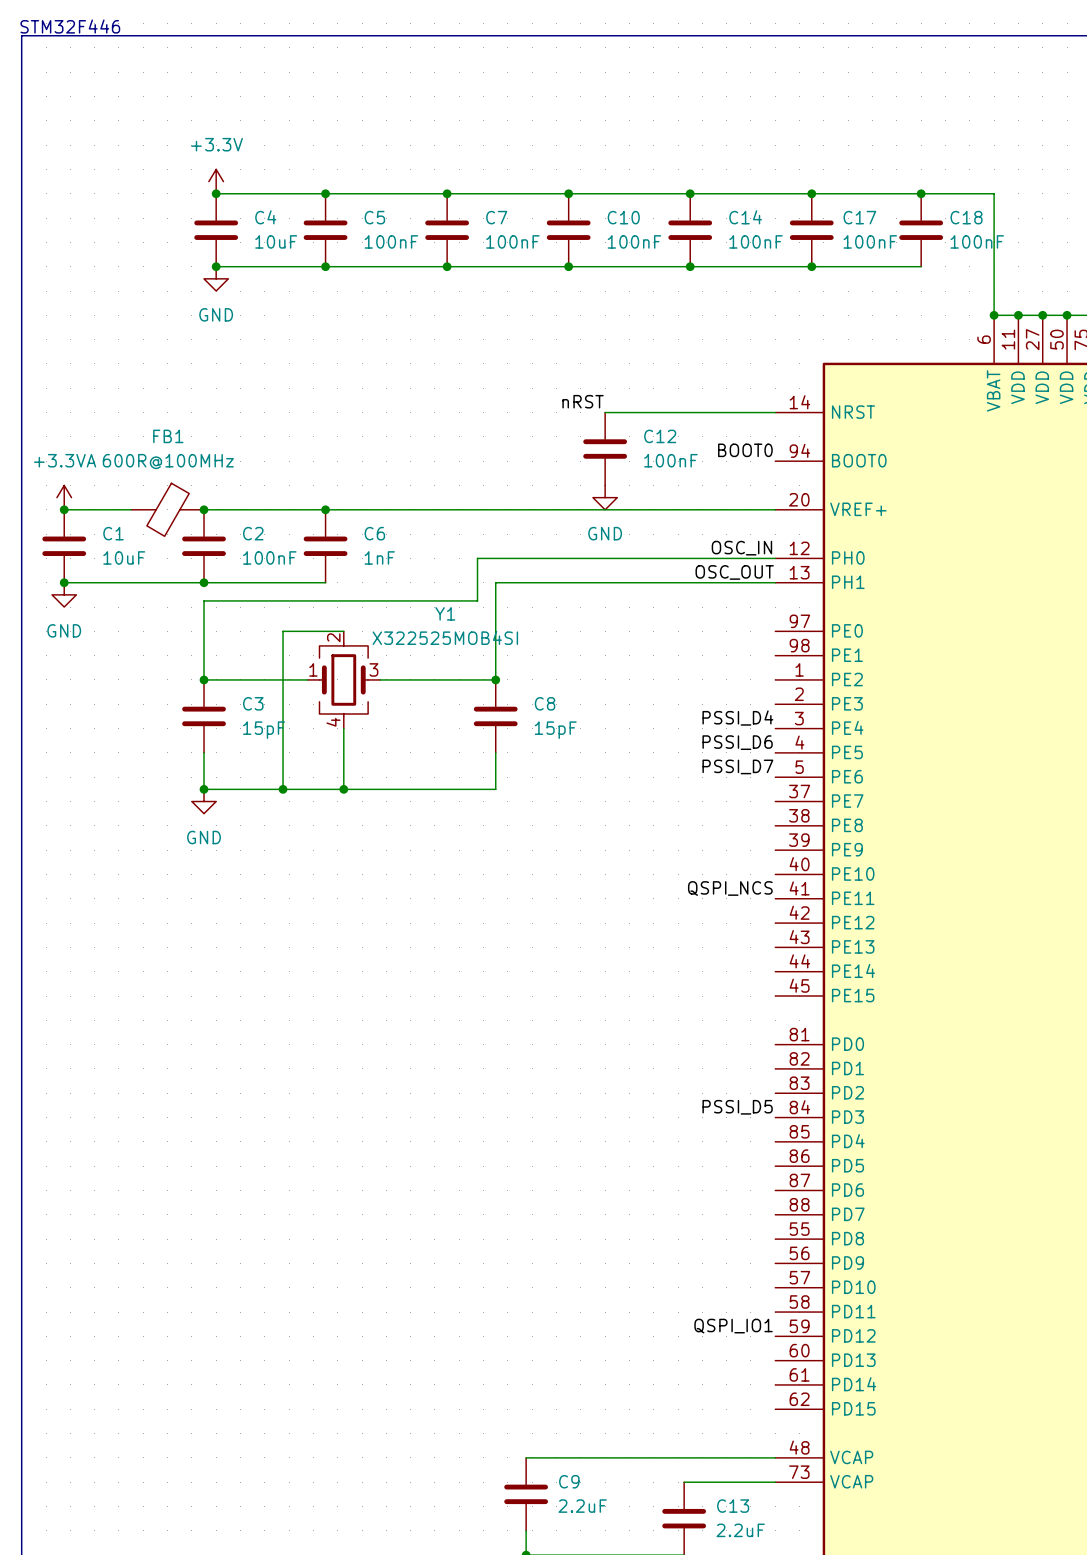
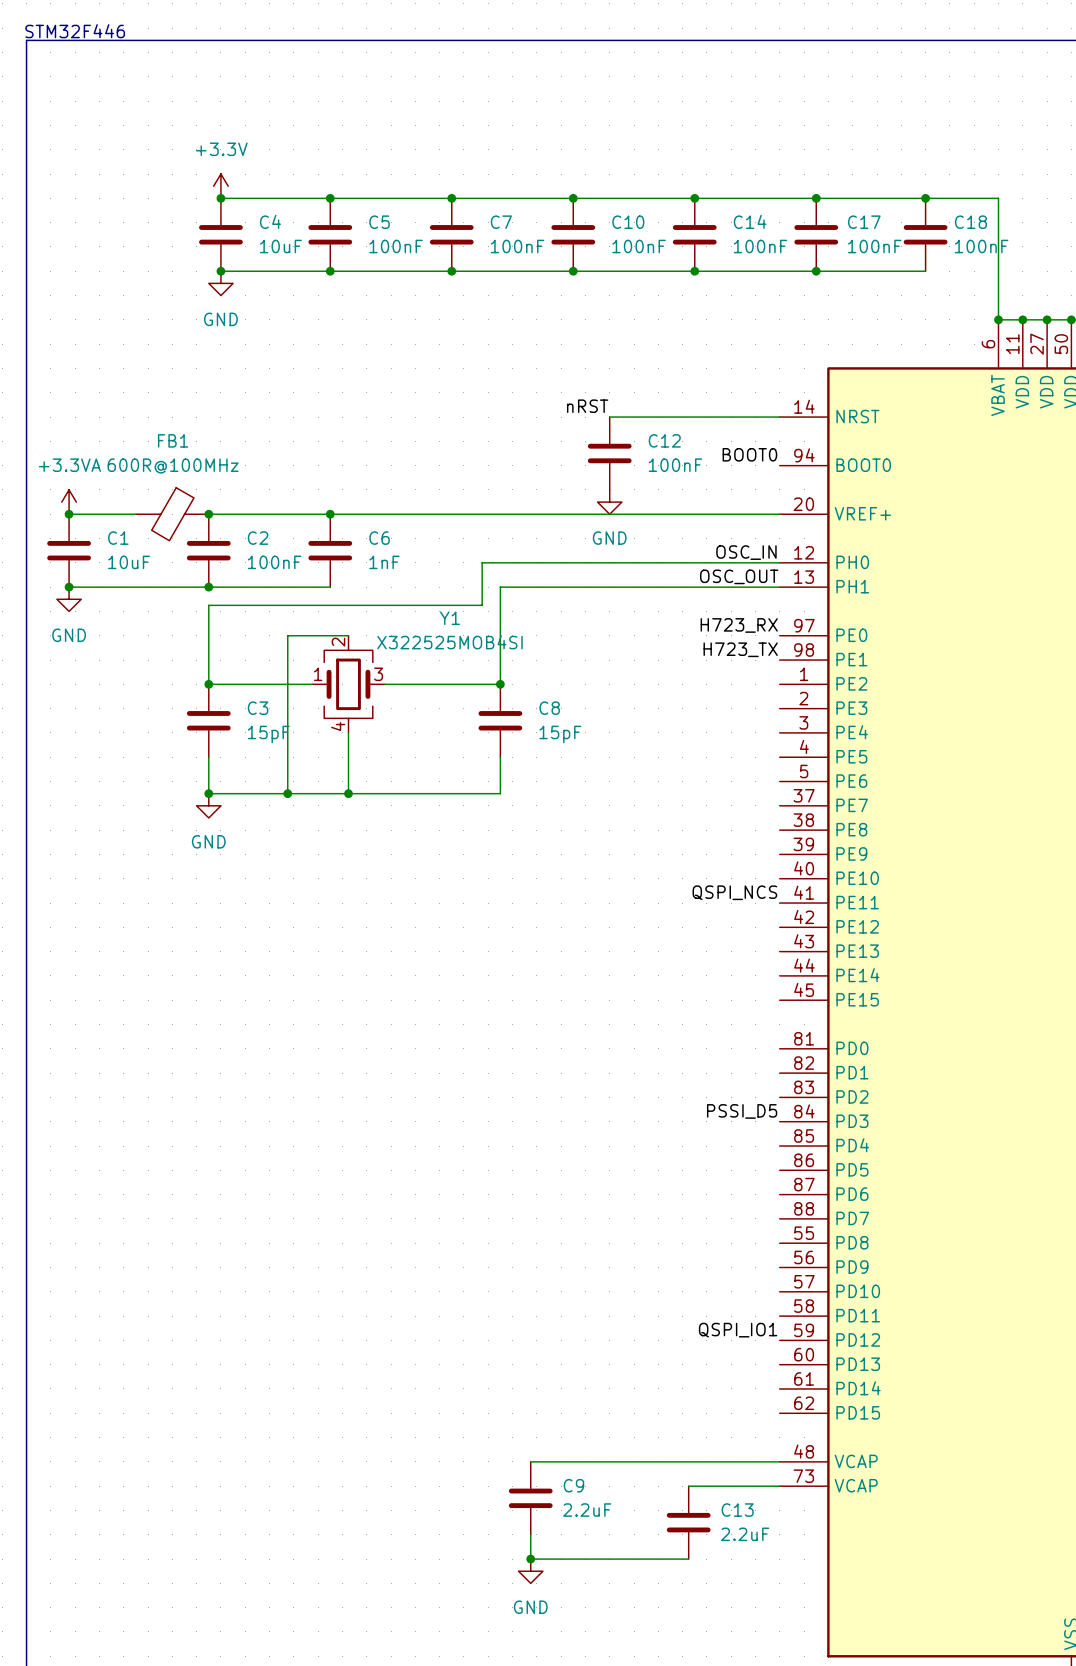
label: none -> H723_RX (739, 625)
label: none -> H723_TX (740, 649)
label: PSSI_D4 (737, 718) -> none
label: PSSI_D6 (737, 742) -> none
label: PSSI_D7 (737, 766) -> none

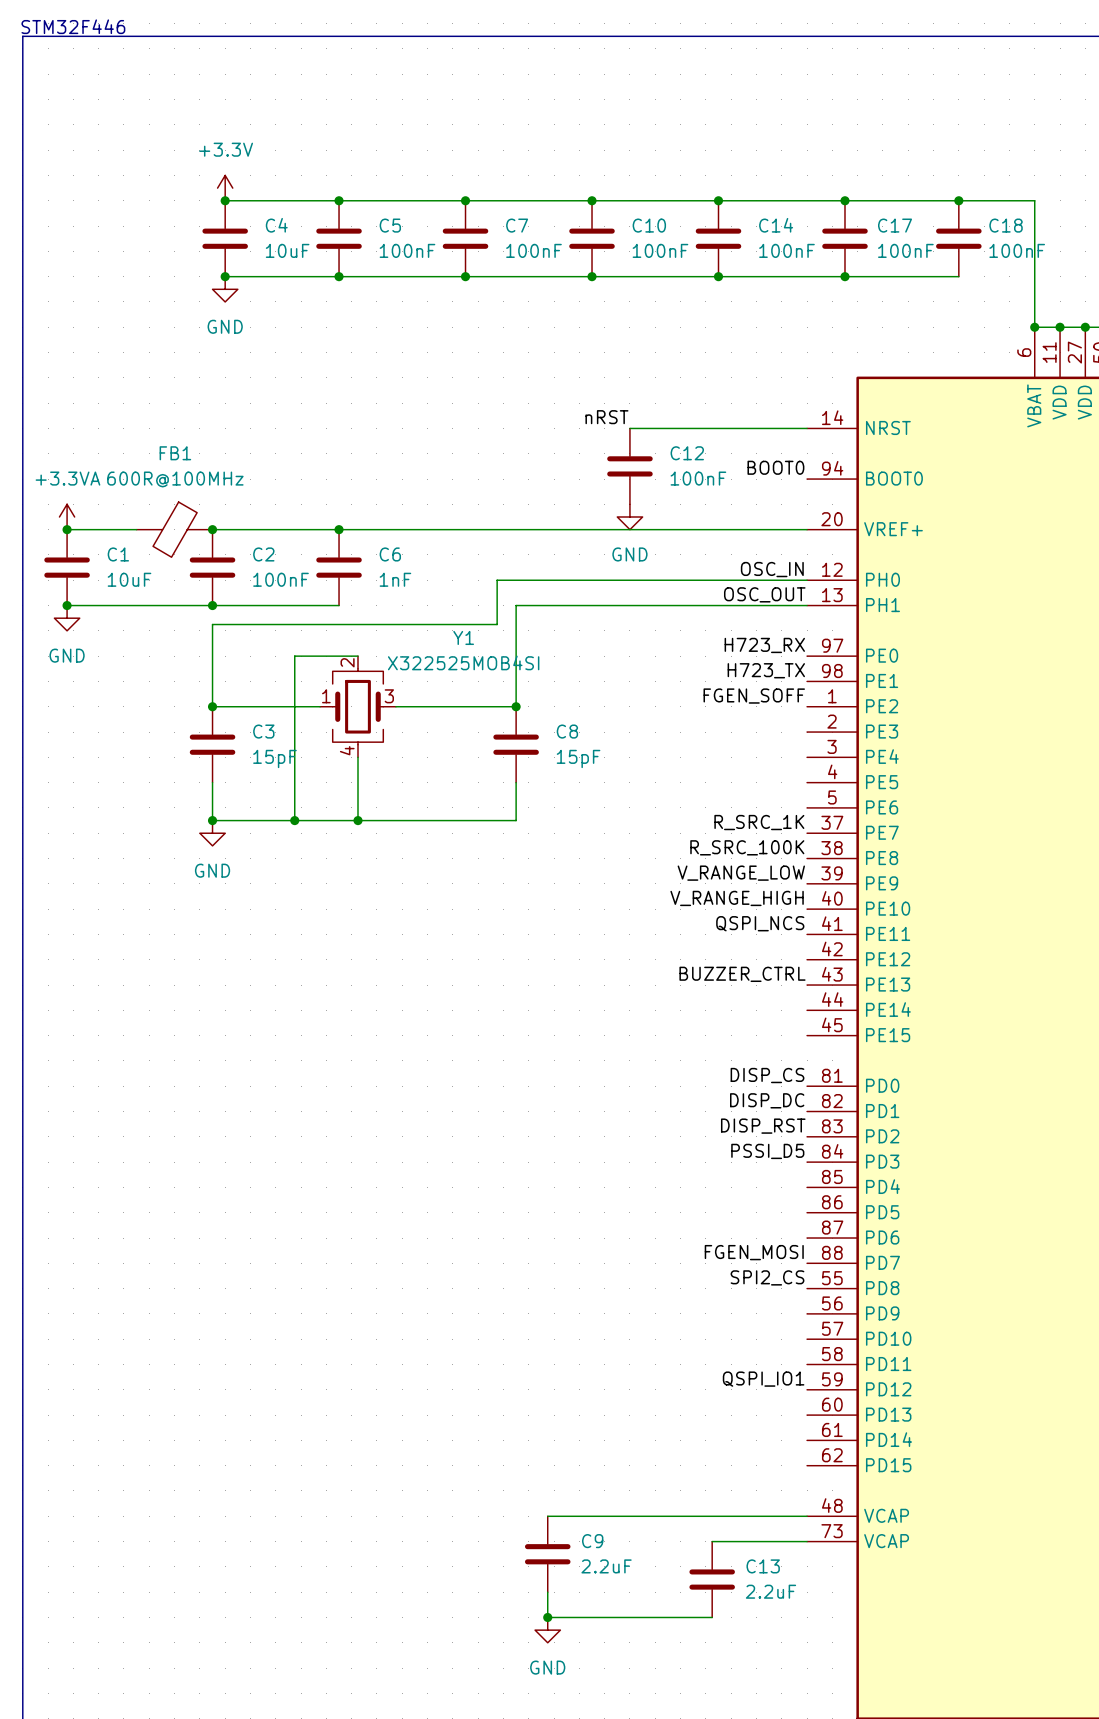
label: none -> FGEN_SOFF (754, 696)
label: none -> R_SRC_1K (759, 822)
label: none -> R_SRC_100K (747, 847)
label: none -> V_RANGE_LOW (741, 873)
label: none -> V_RANGE_HIGH (737, 898)
label: none -> BUZZER_CTRL (742, 974)
label: none -> DISP_CS (767, 1075)
label: none -> DISP_DC (767, 1100)
label: none -> DISP_RST (763, 1126)
label: none -> FGEN_MOSI (754, 1252)
label: none -> SPI2_CS (767, 1277)

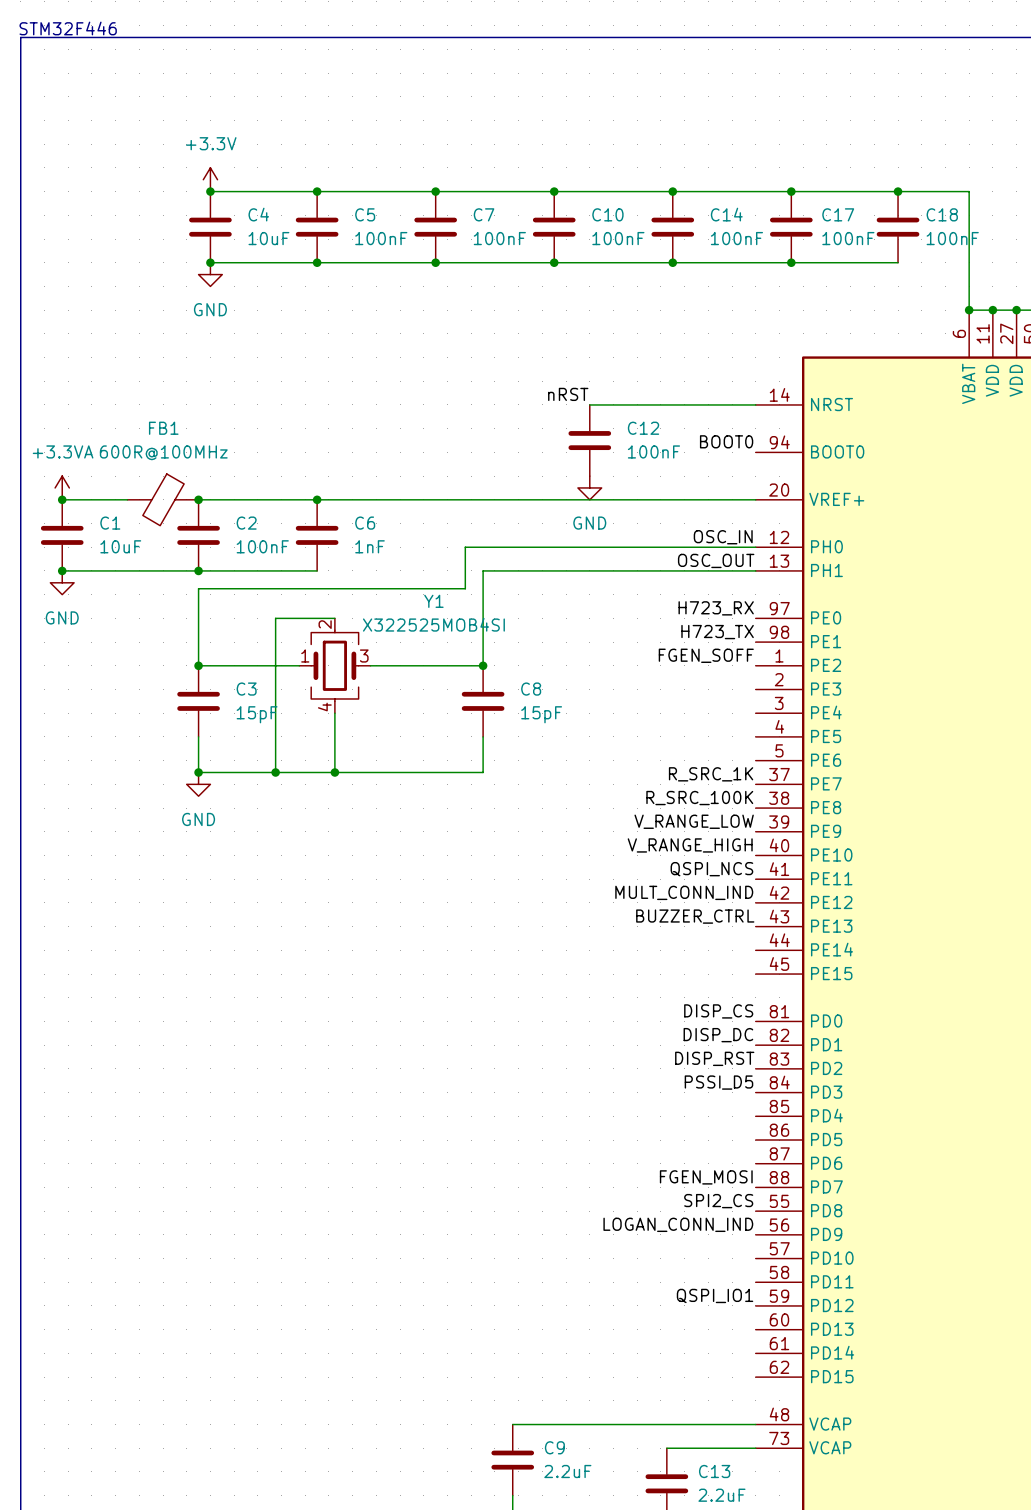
label: none -> MULT_CONN_IND (684, 892)
label: none -> LOGAN_CONN_IND (678, 1224)

